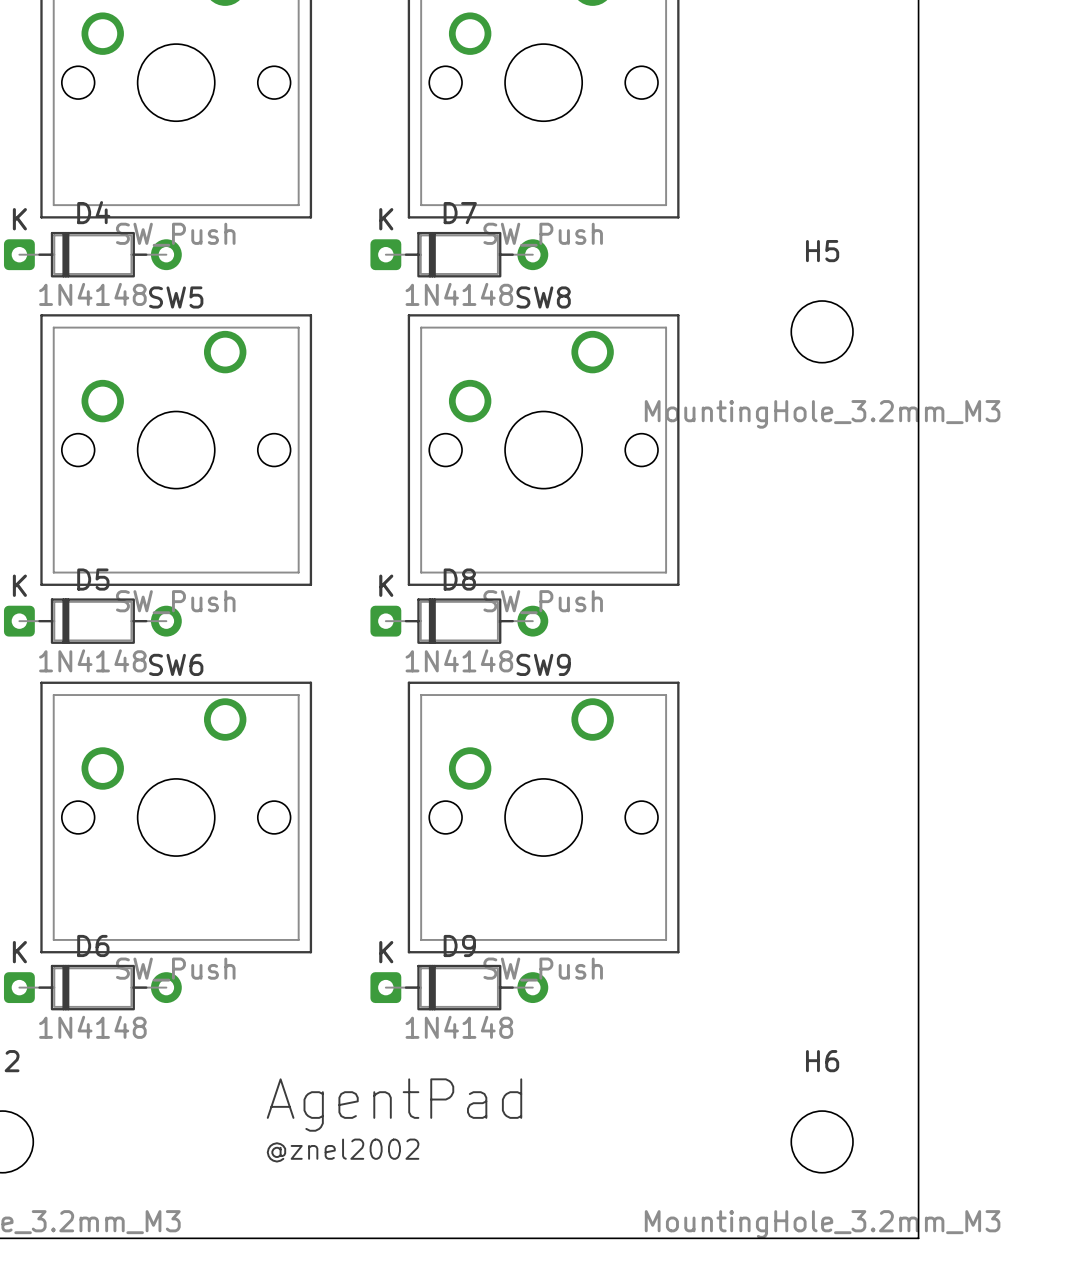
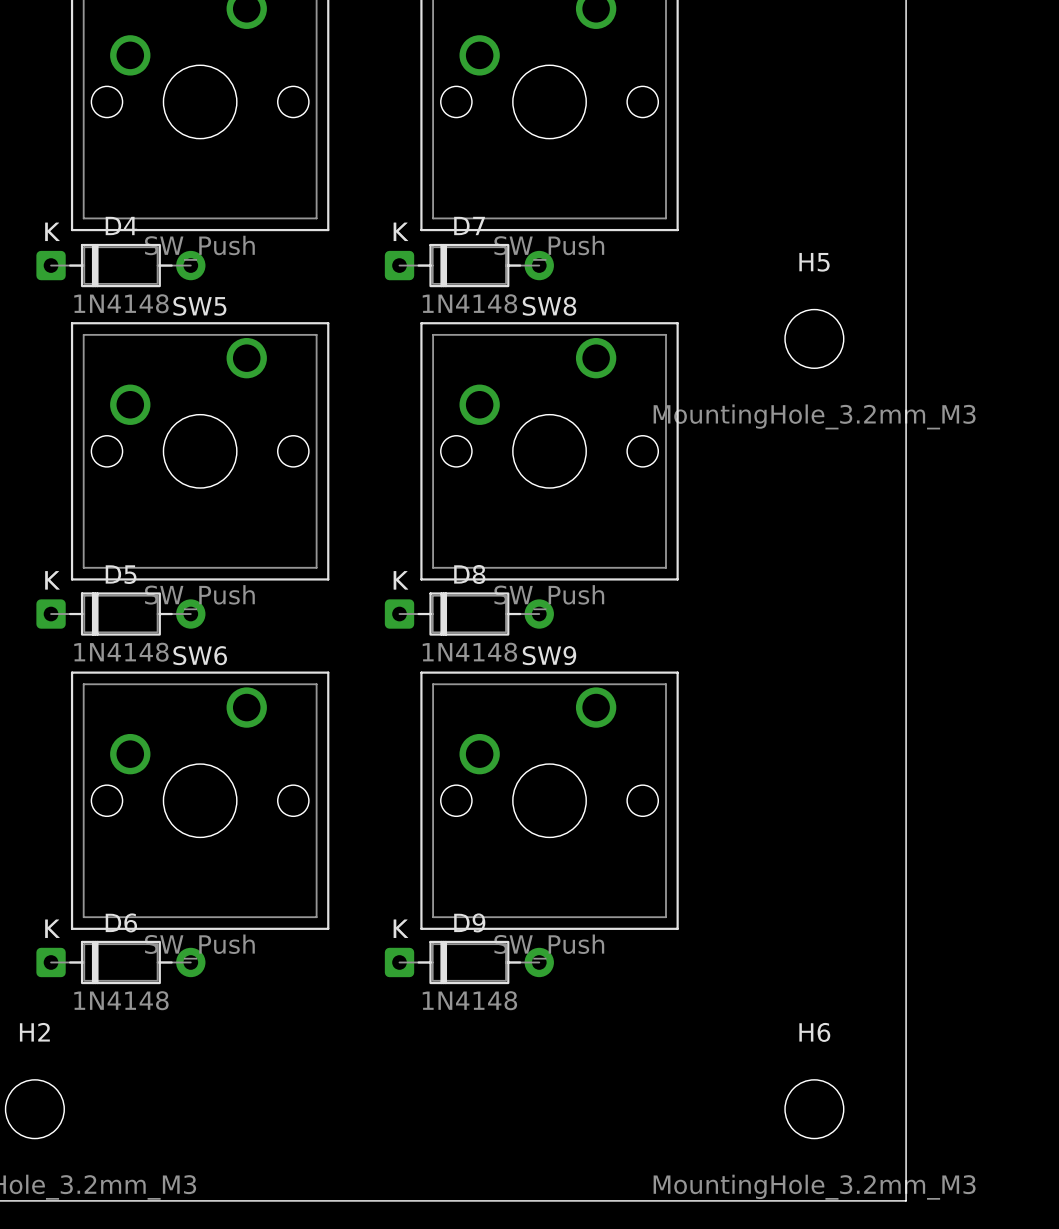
text: AgentPad (394, 1105) -> none
text: @znel2002 (343, 1150) -> none

